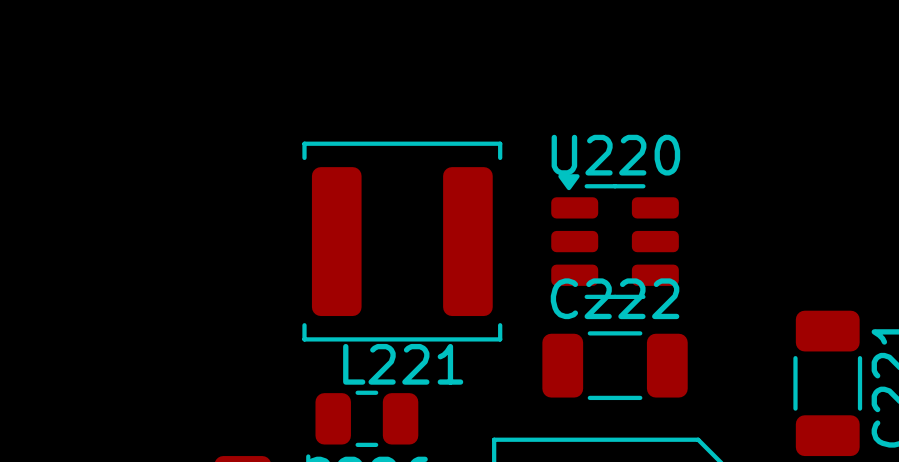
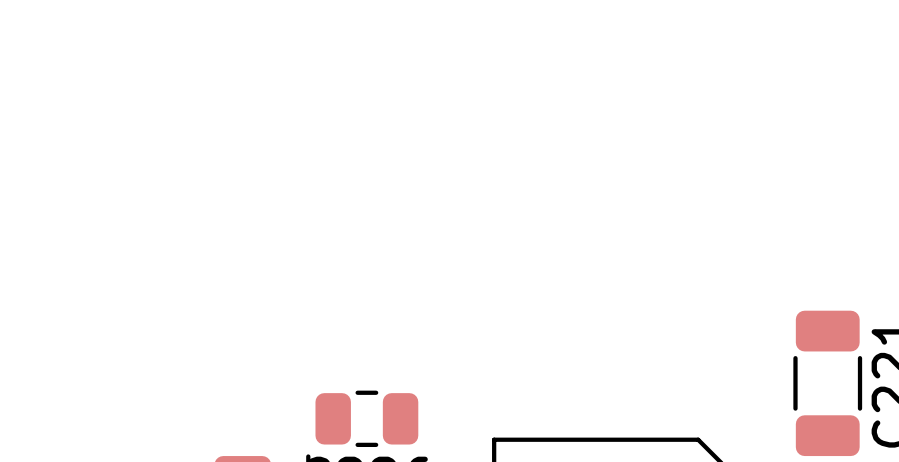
U220: (615, 236) -> none
L221: (402, 241) -> none
C222: (615, 365) -> none

